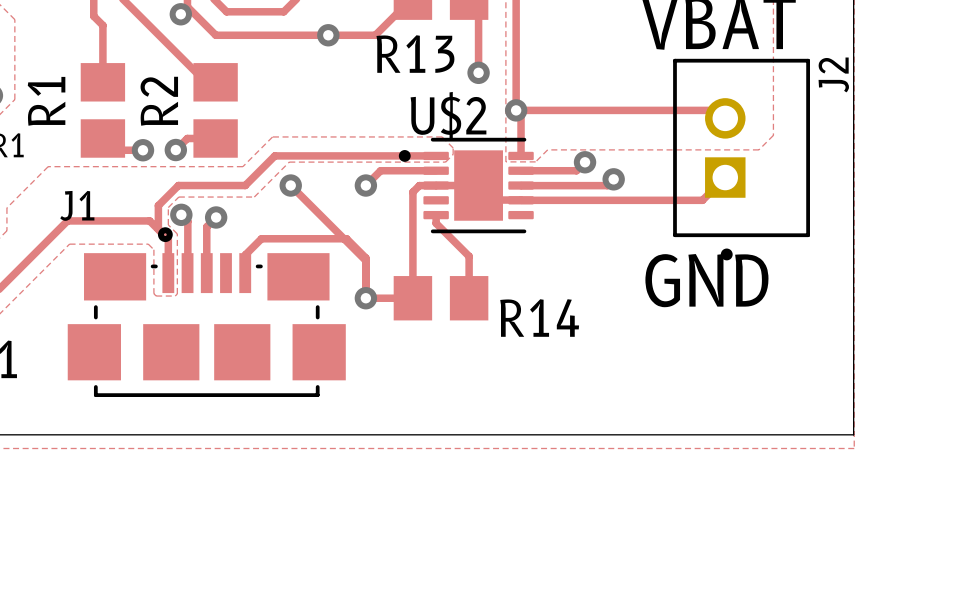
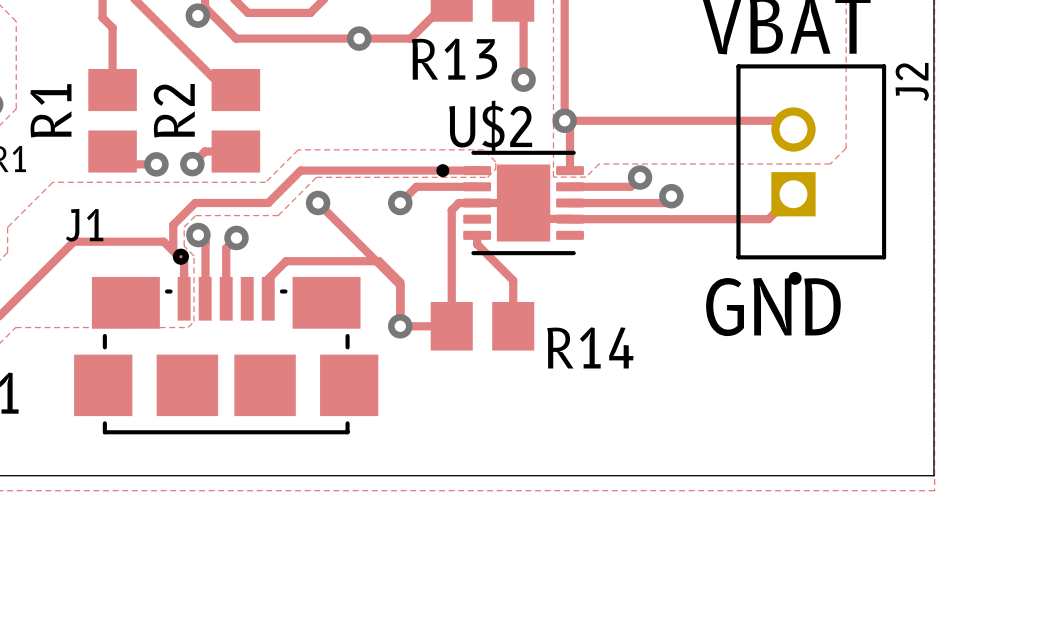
zone outline: (175, 296) (156, 296) (153, 293) (153, 249) (148, 244) (69, 244) (14, 299) -> (191, 323) (188, 327) (15, 327)

